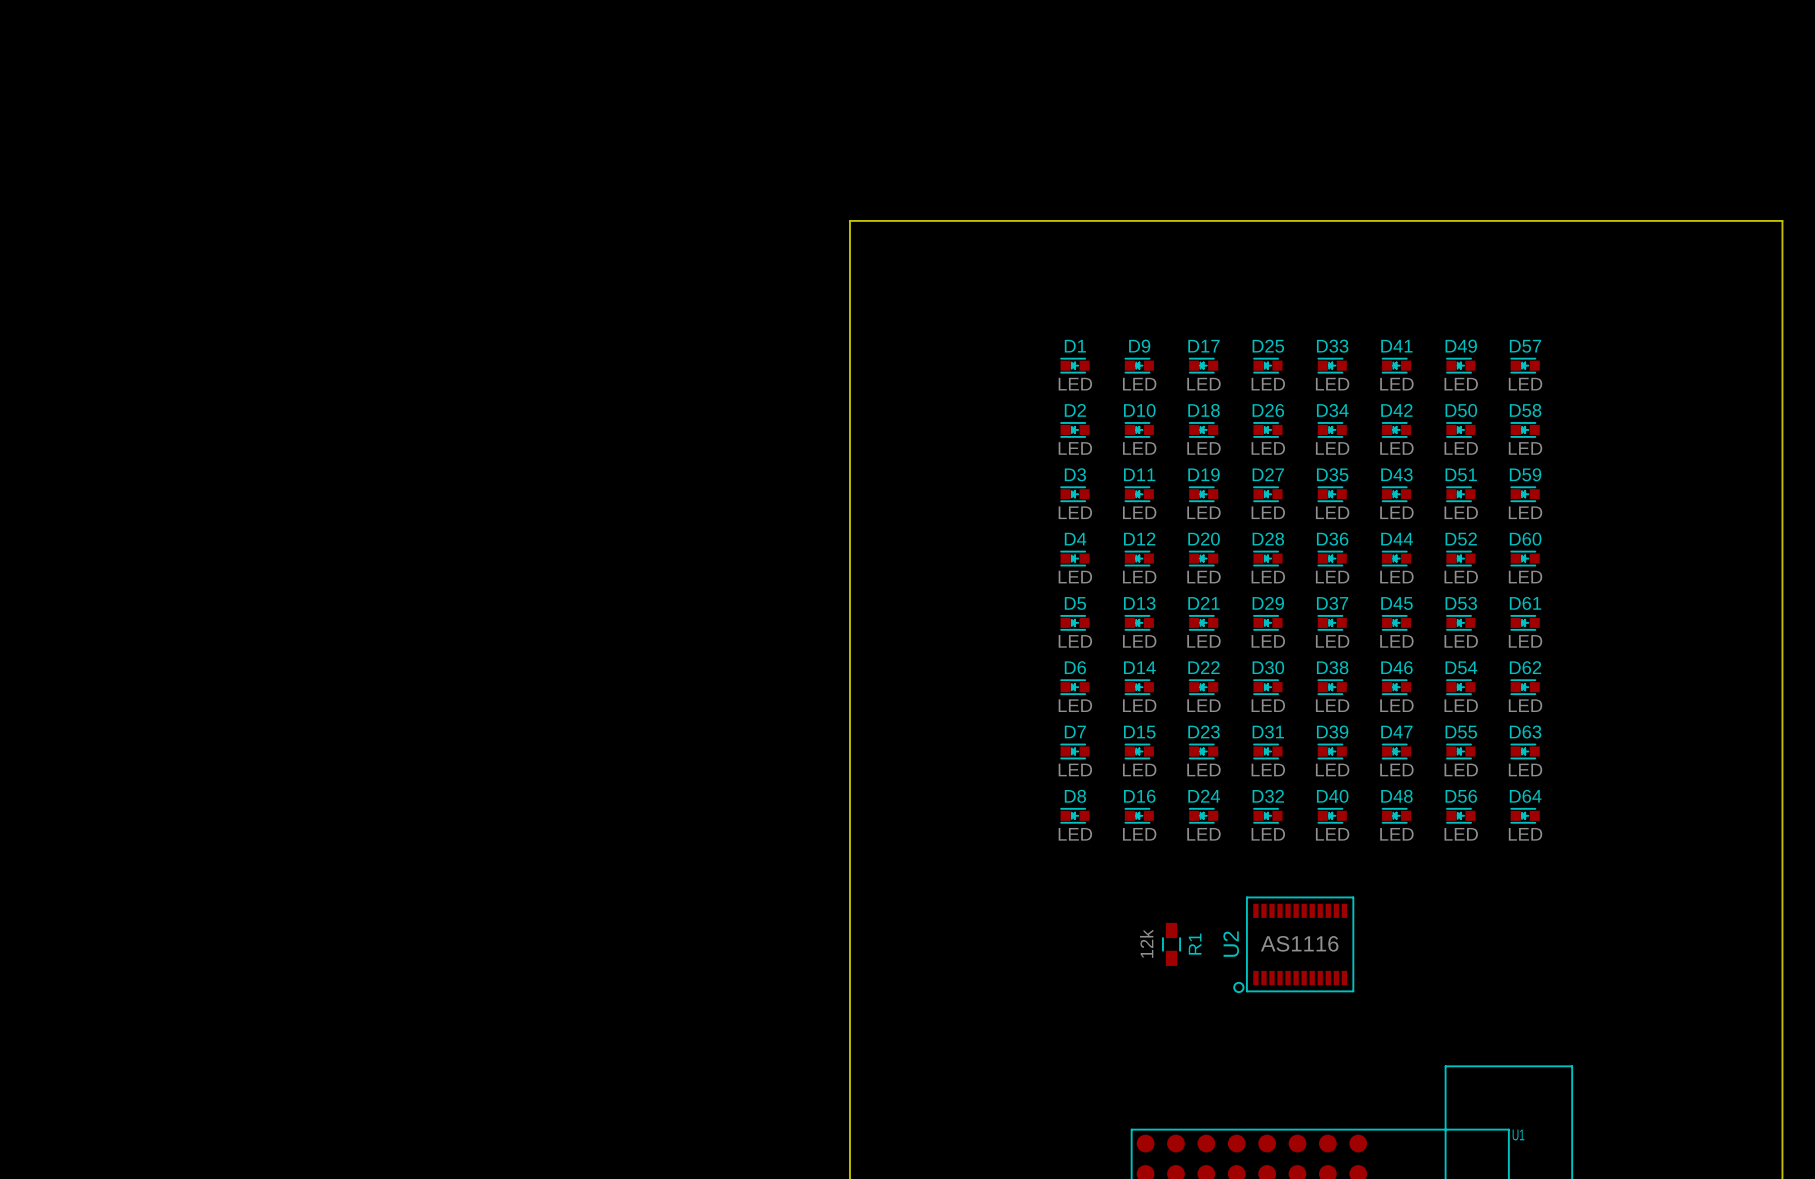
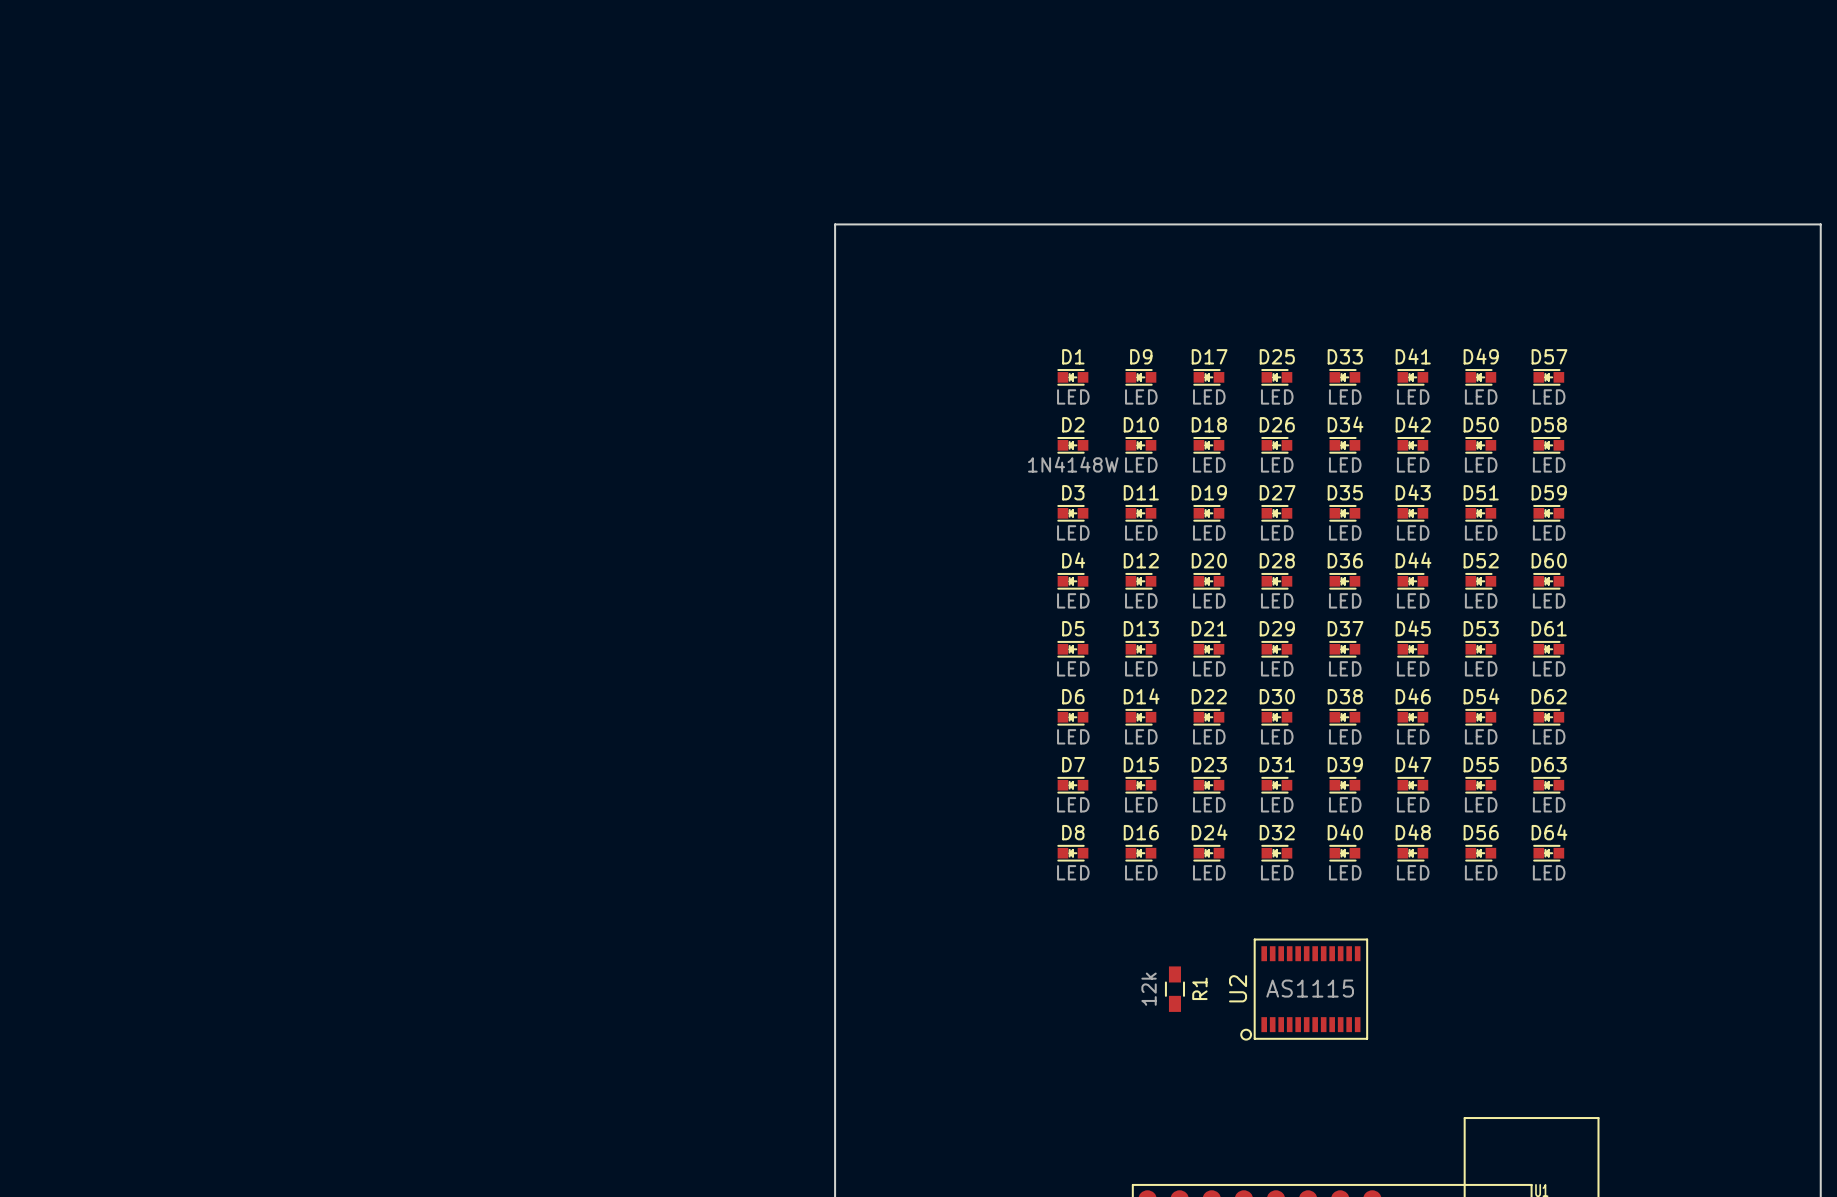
D2 value: LED (1075, 448) -> 1N4148W (1073, 464)
U2 value: AS1116 (1299, 943) -> AS1115 (1310, 988)

